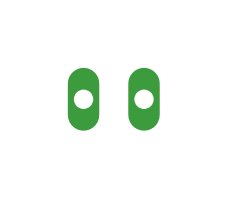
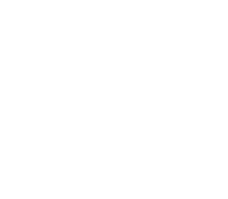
part: (113, 99) -> none

